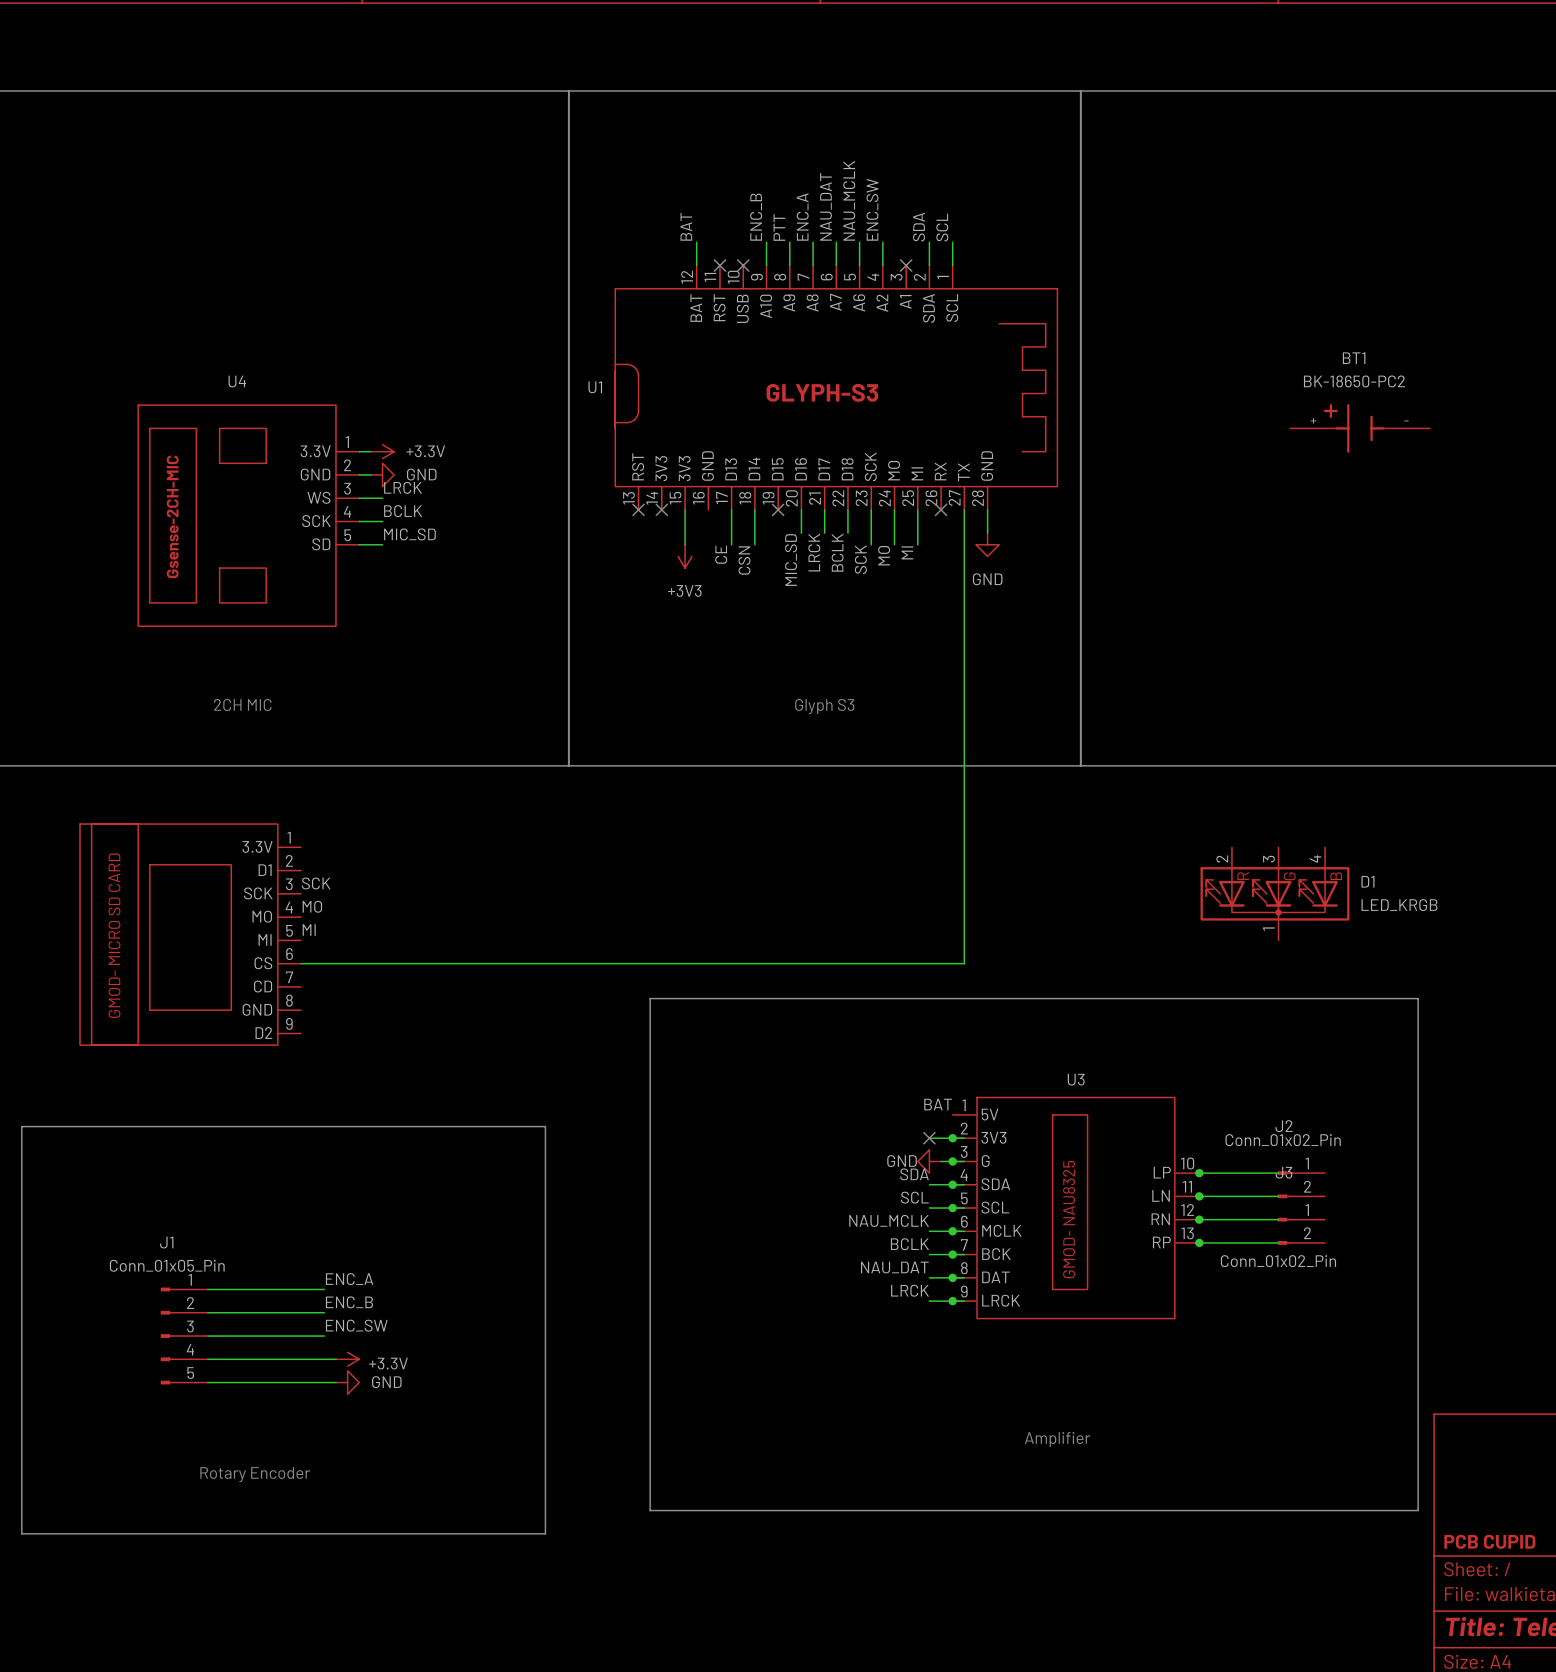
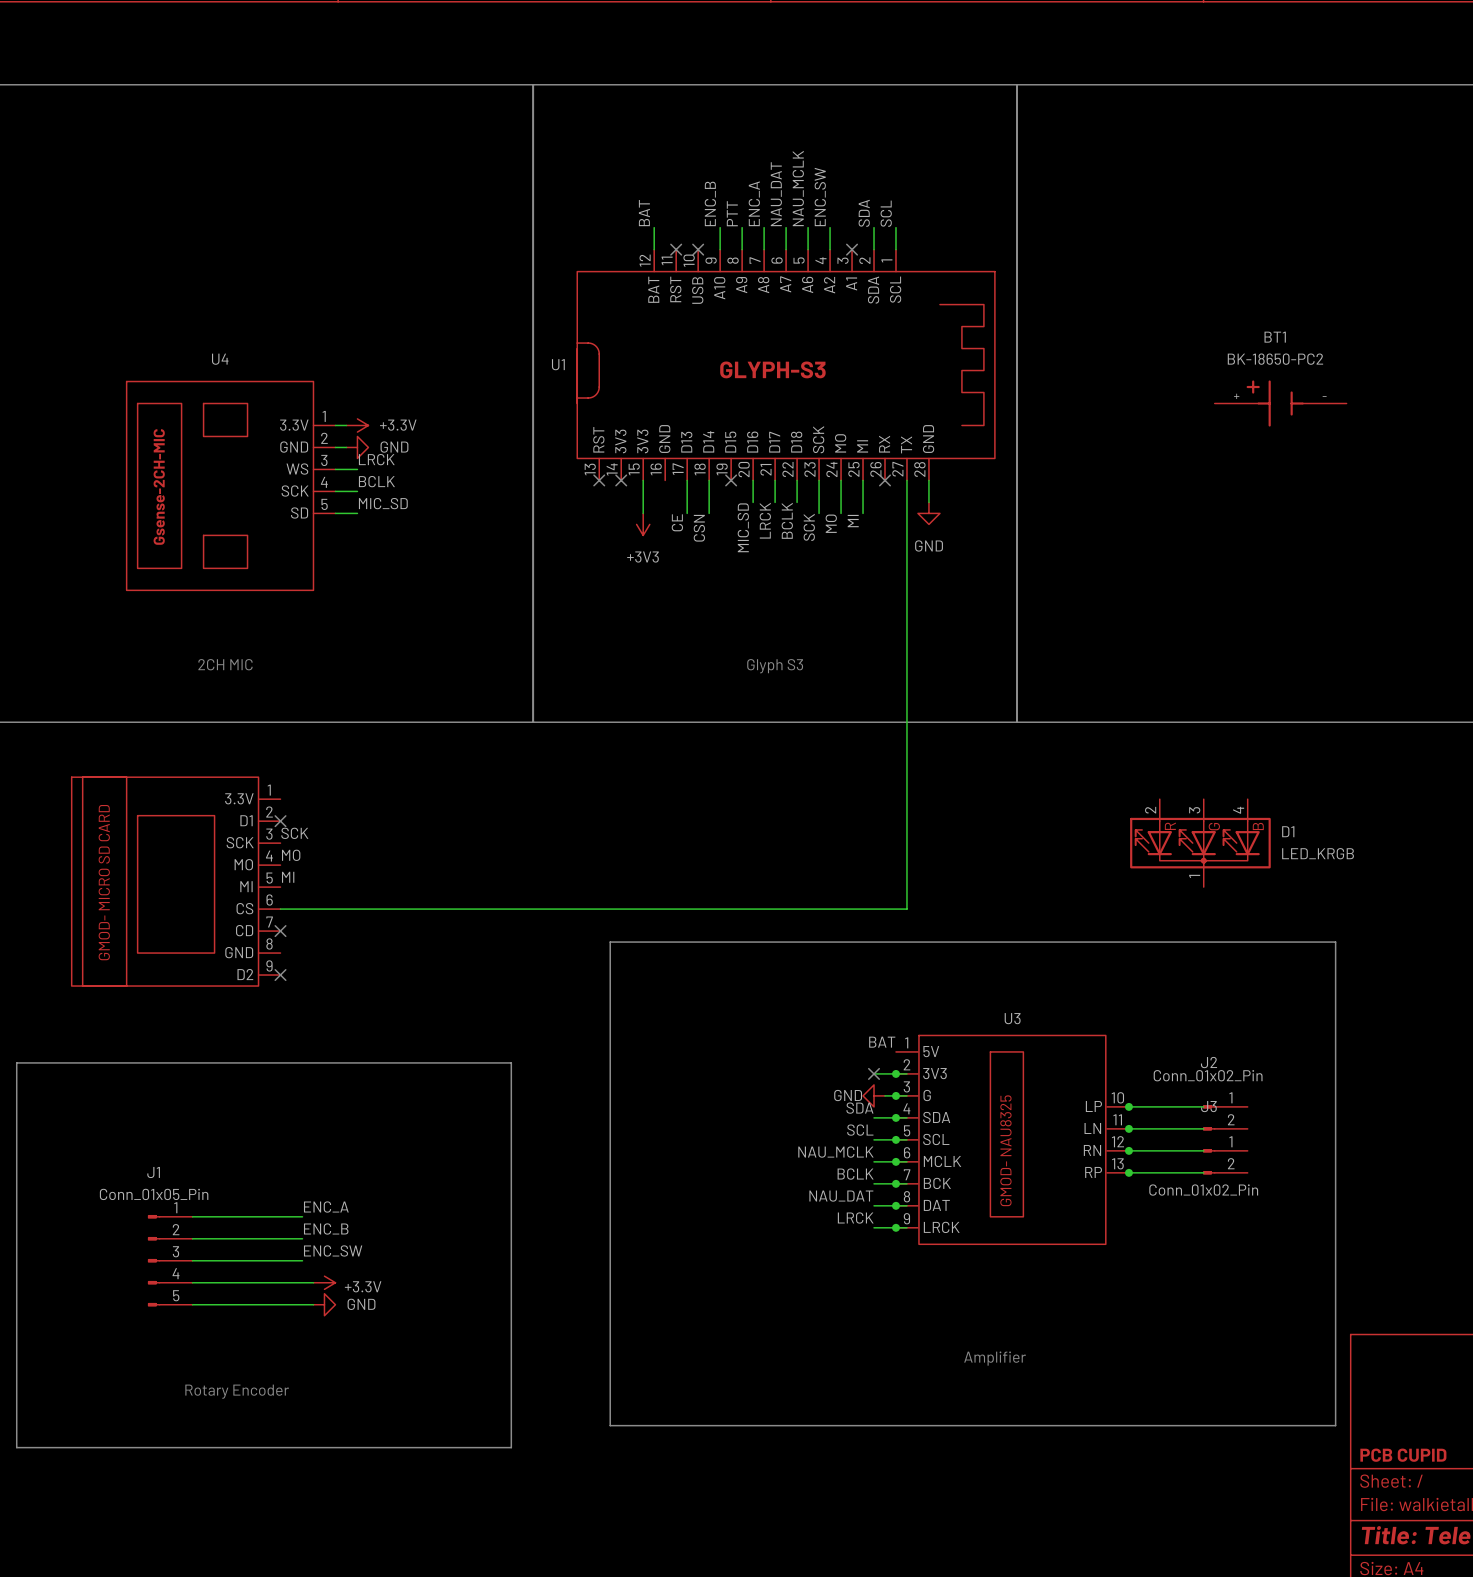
no-connect mark: none -> (280, 821)
no-connect mark: none -> (280, 931)
no-connect mark: none -> (280, 975)

